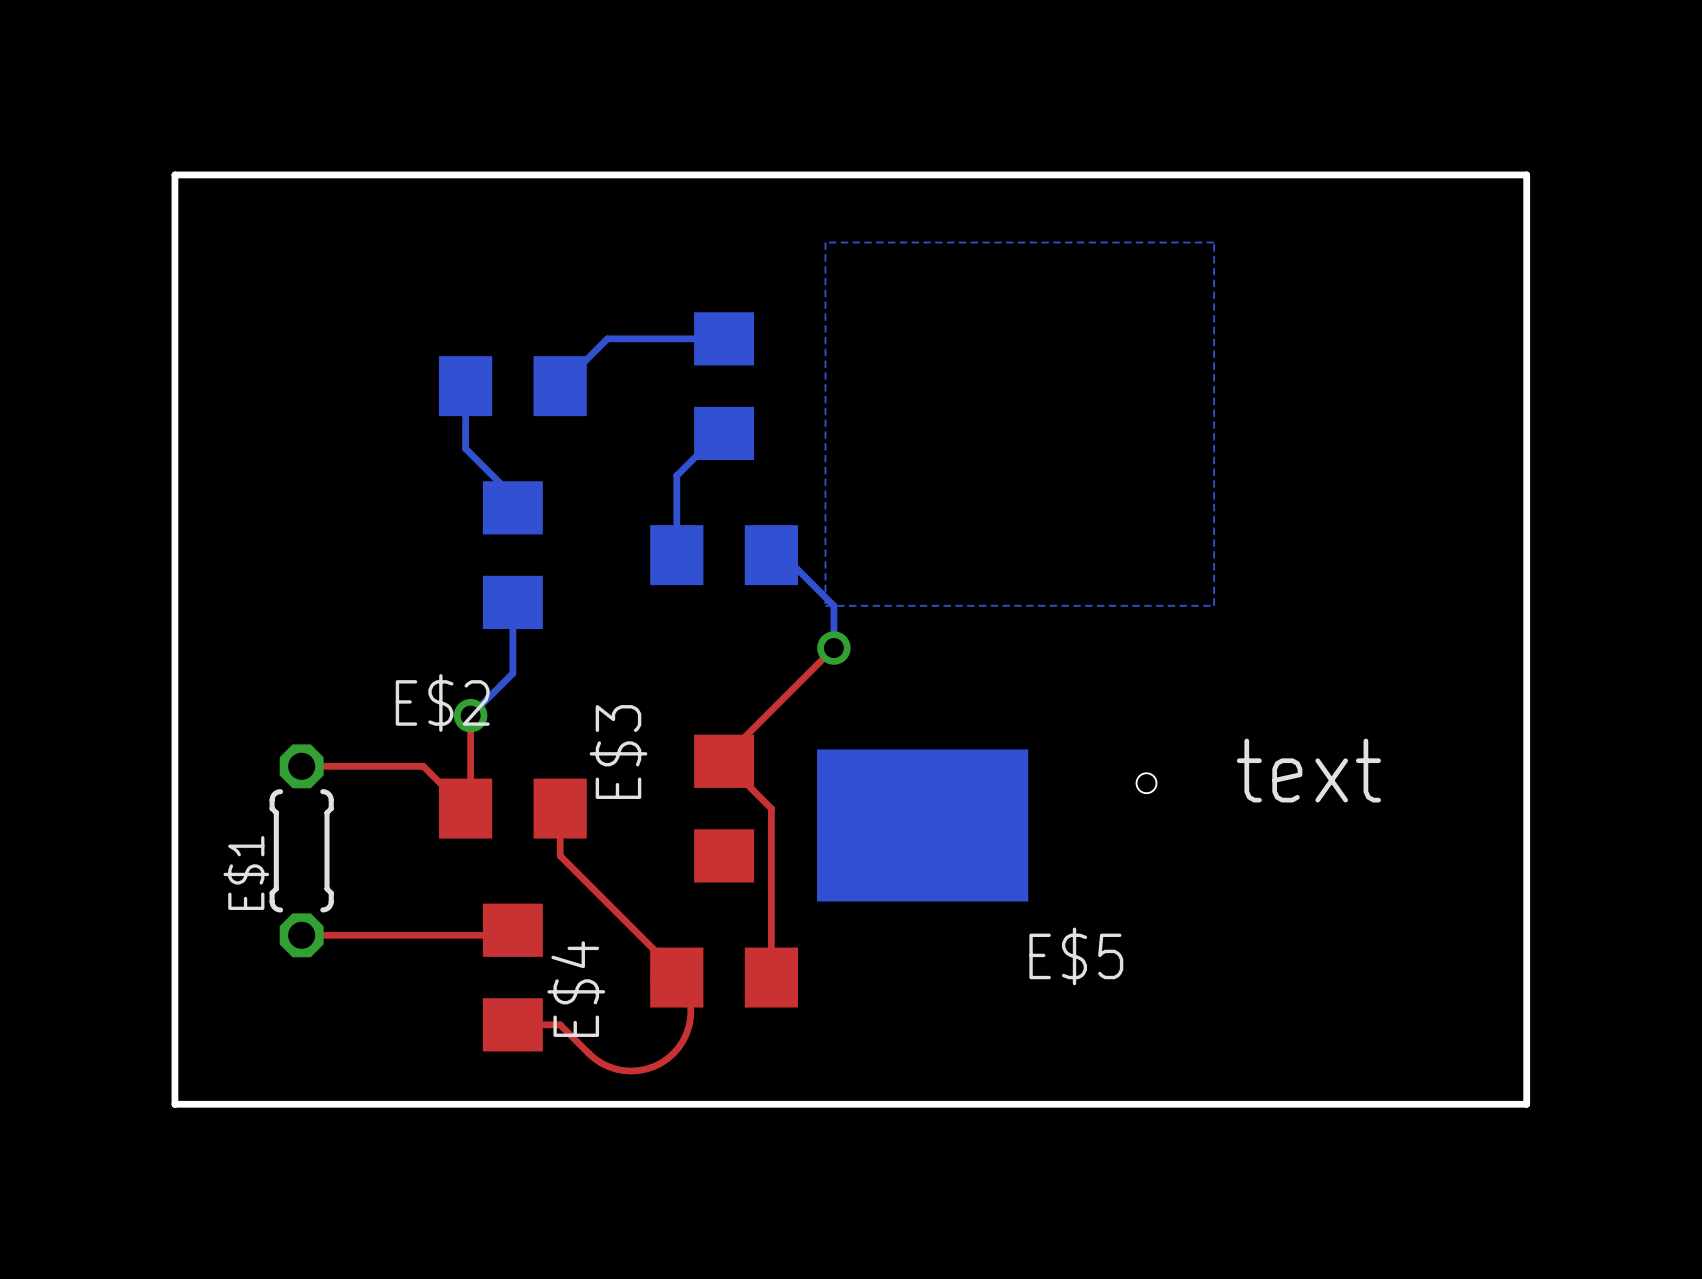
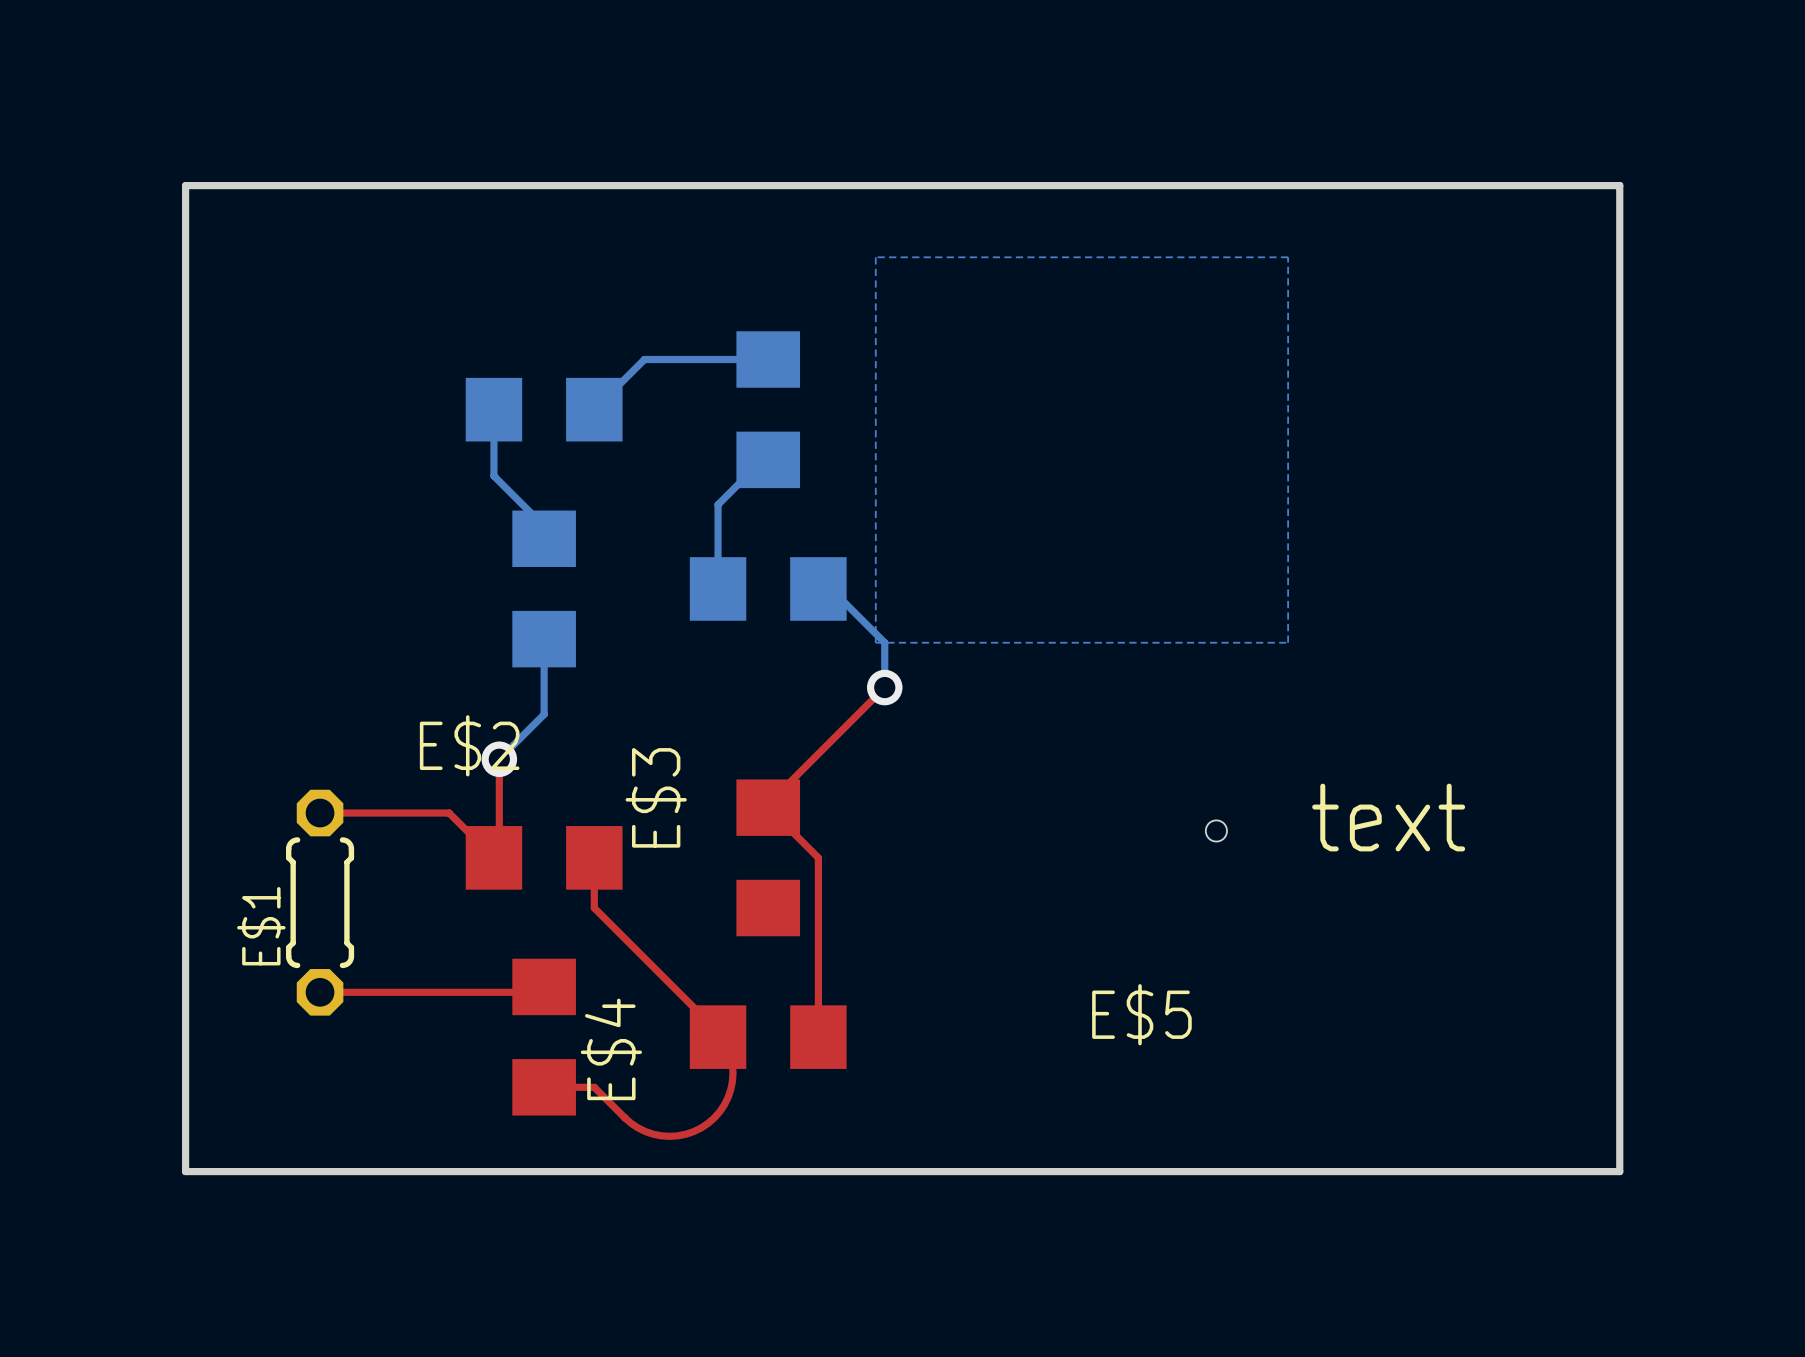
drawing: [817, 749, 1029, 902] -> none

